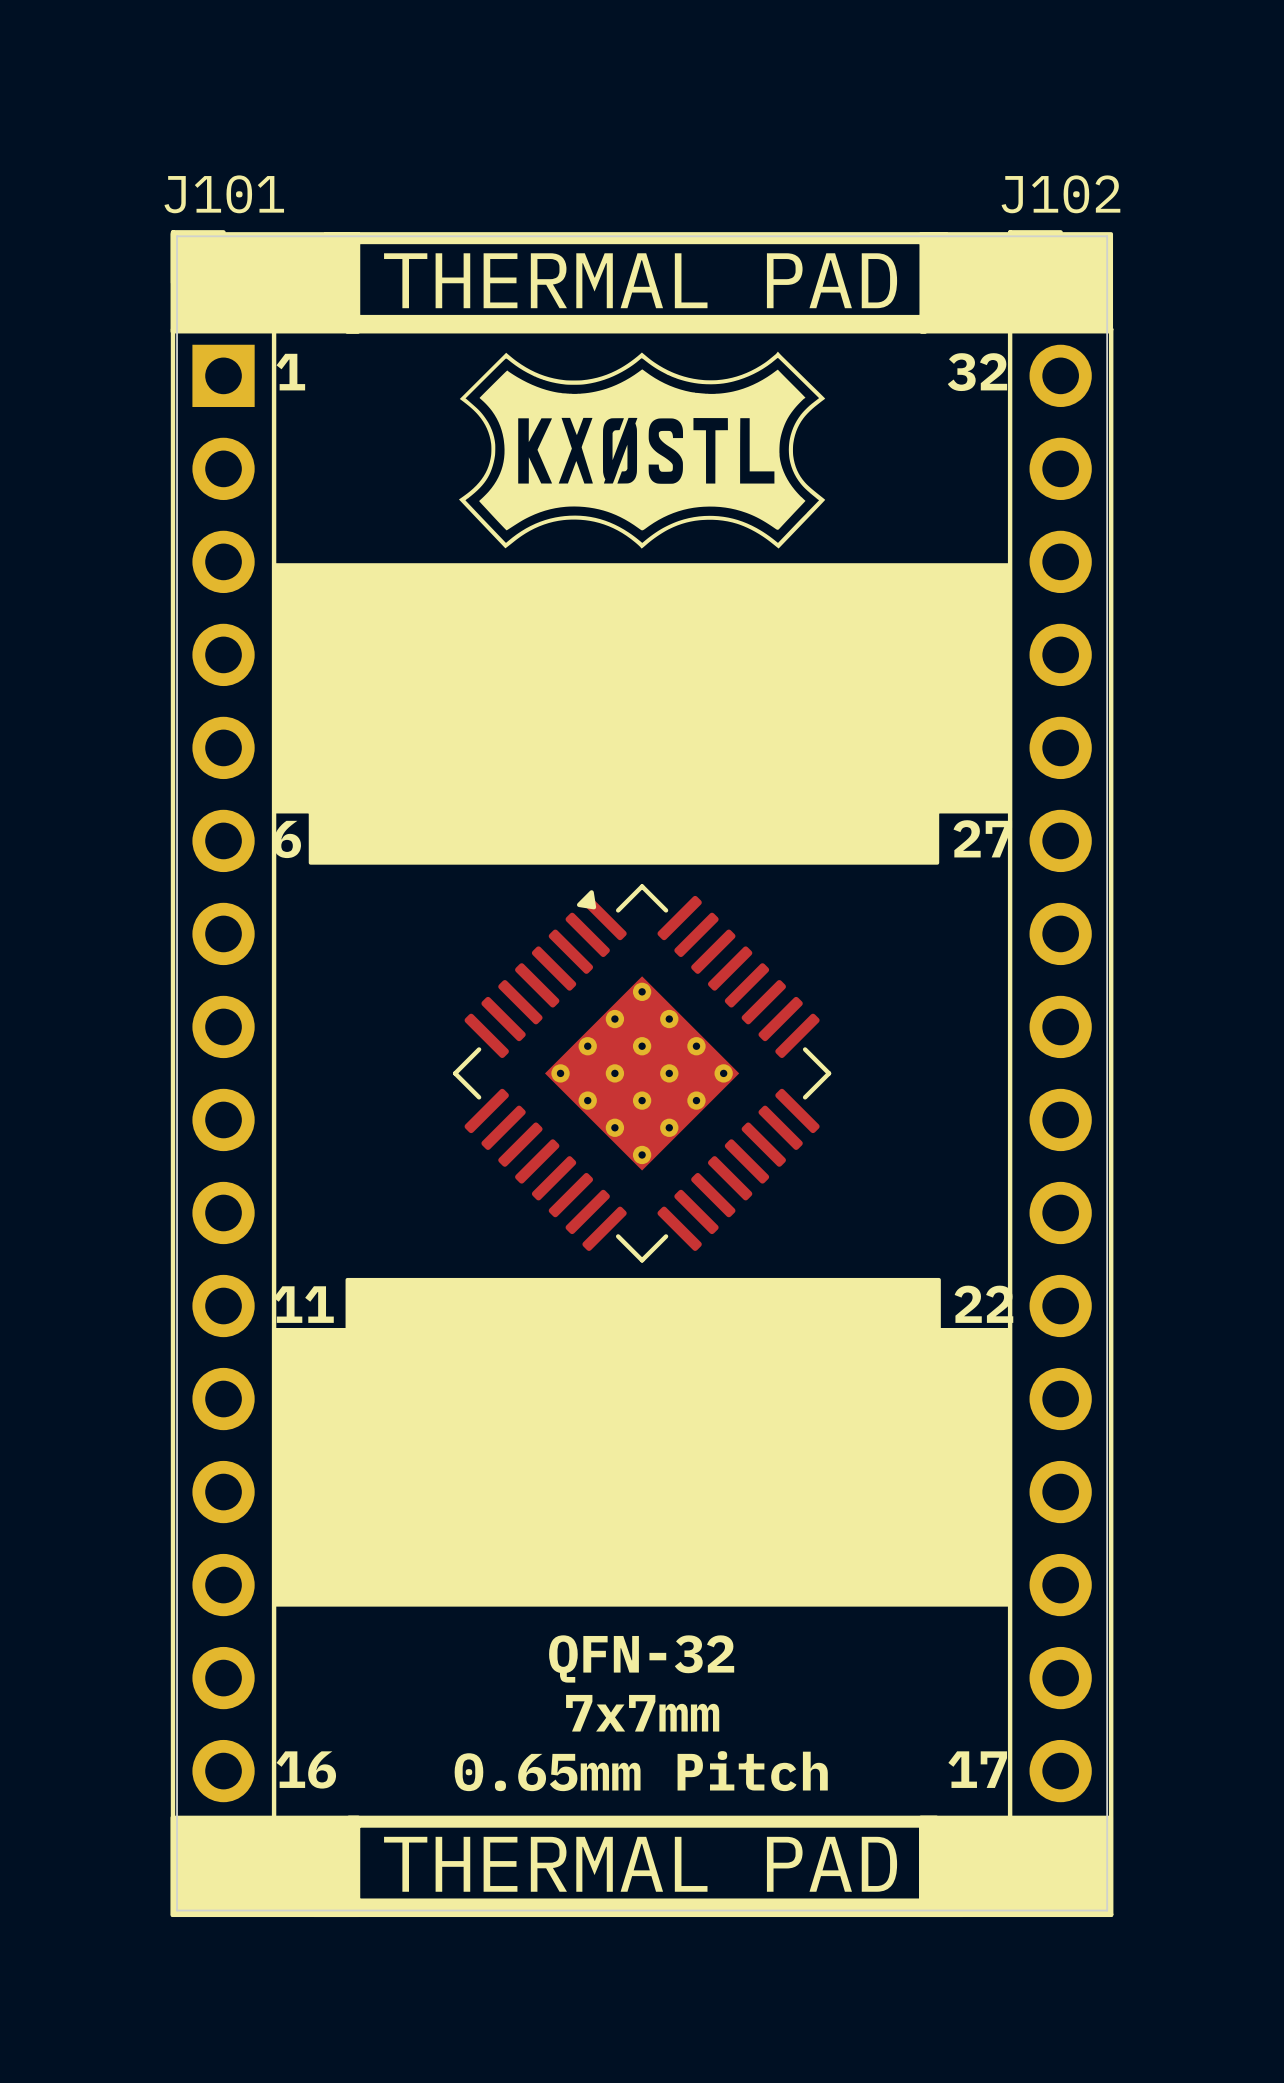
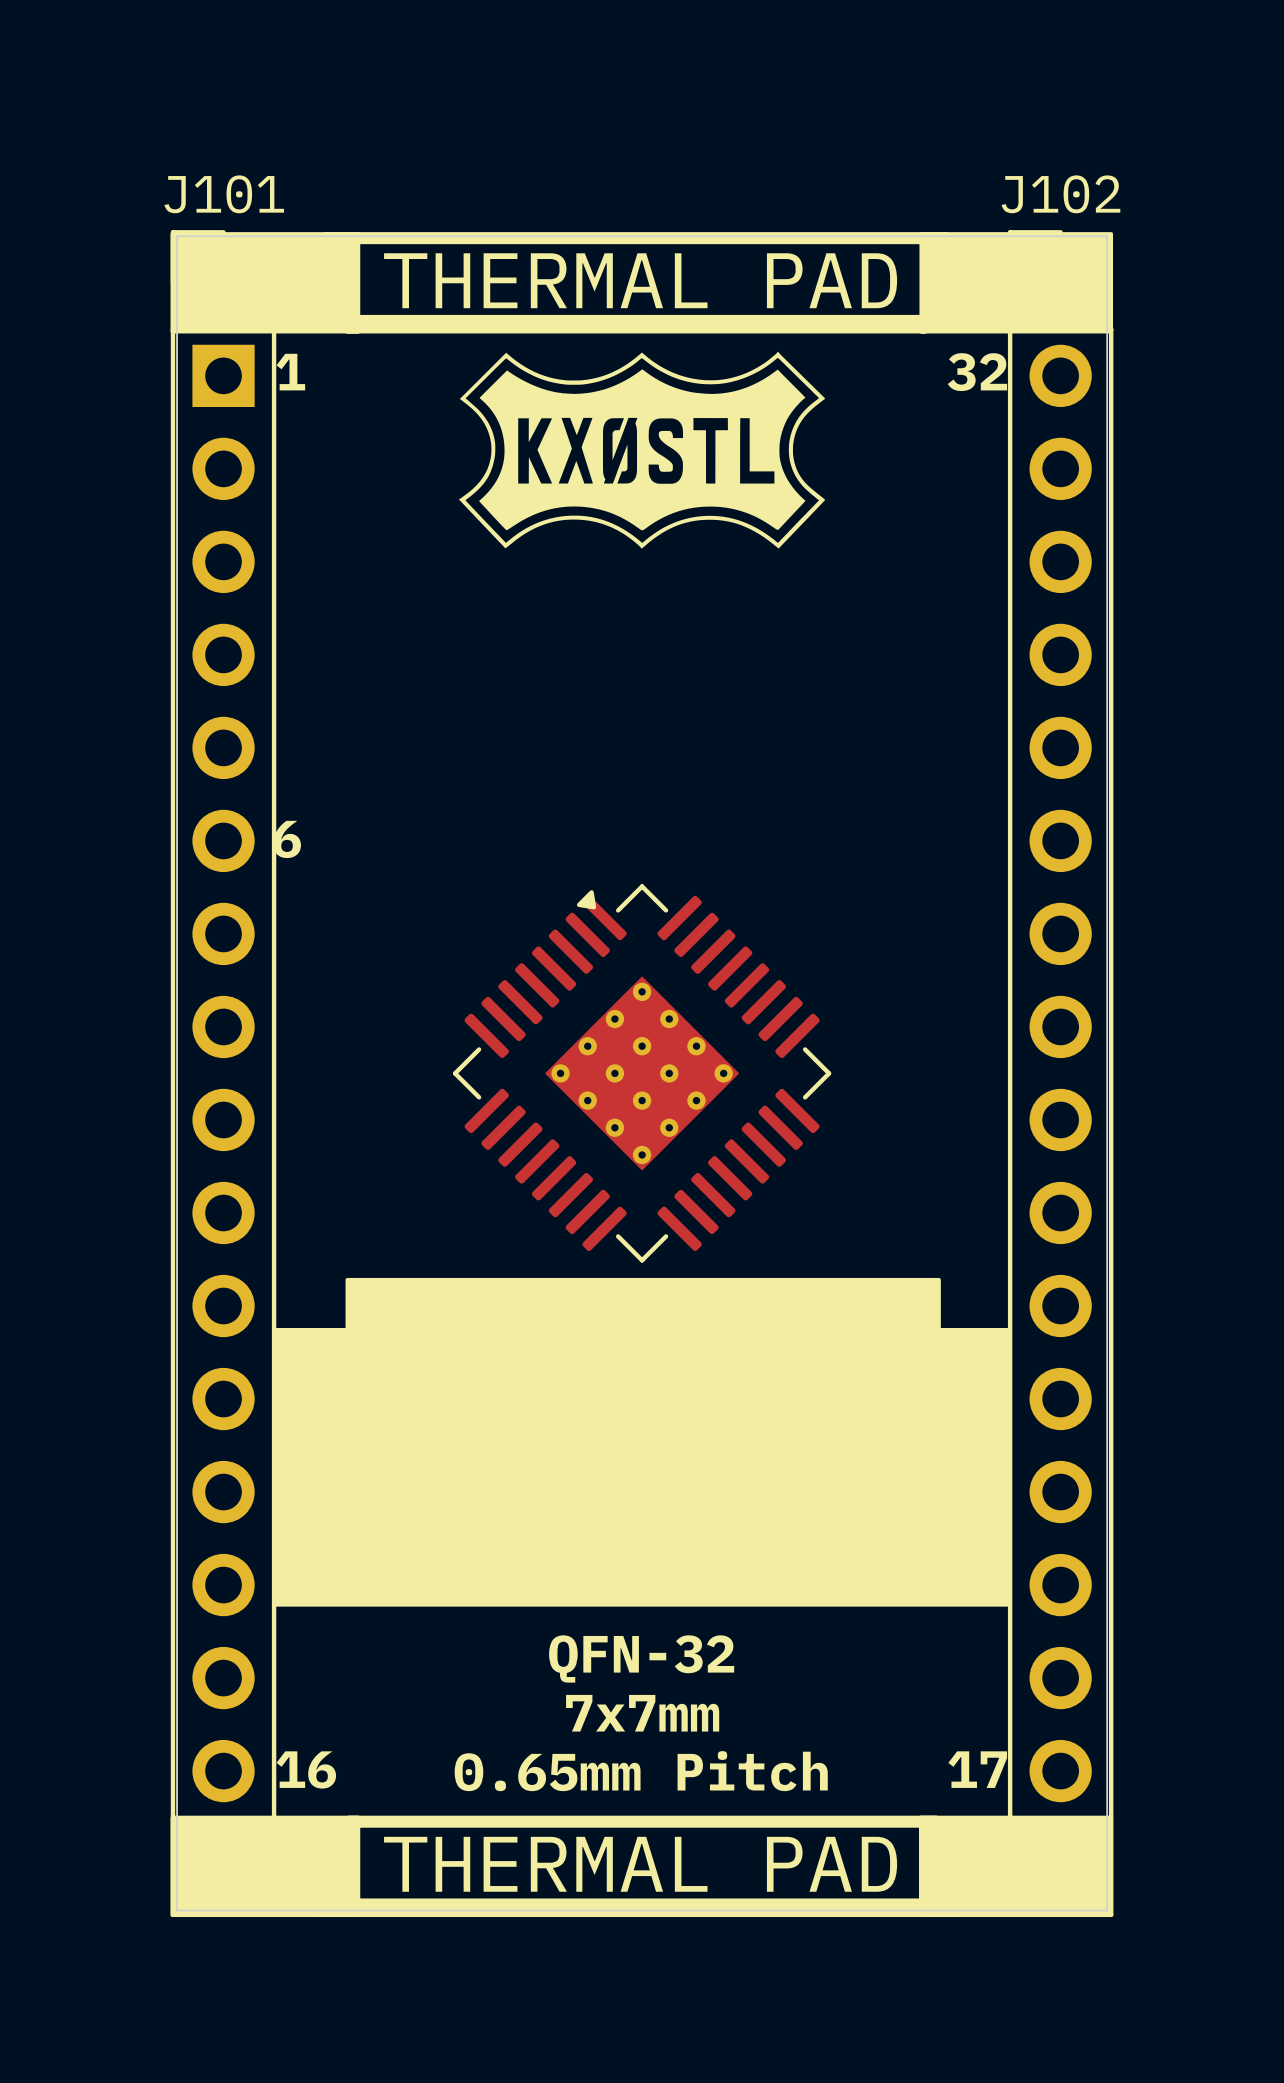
drawing: [273, 563, 1012, 865] -> none
text: 27 (982, 838) -> none
text: 11 (303, 1304) -> none
text: 22 (983, 1304) -> none

